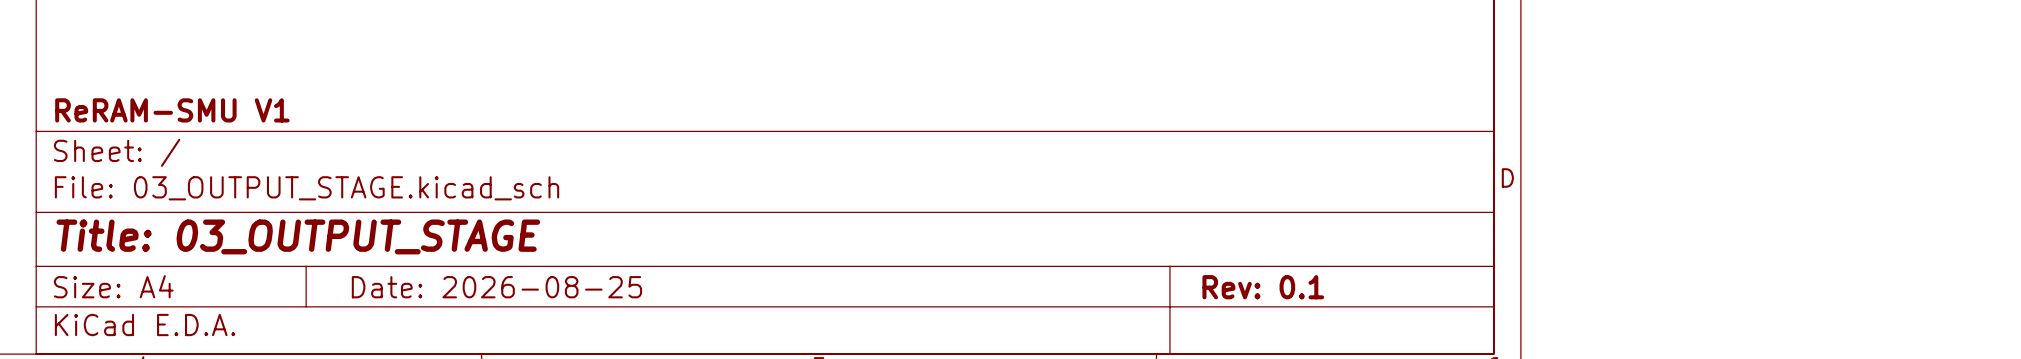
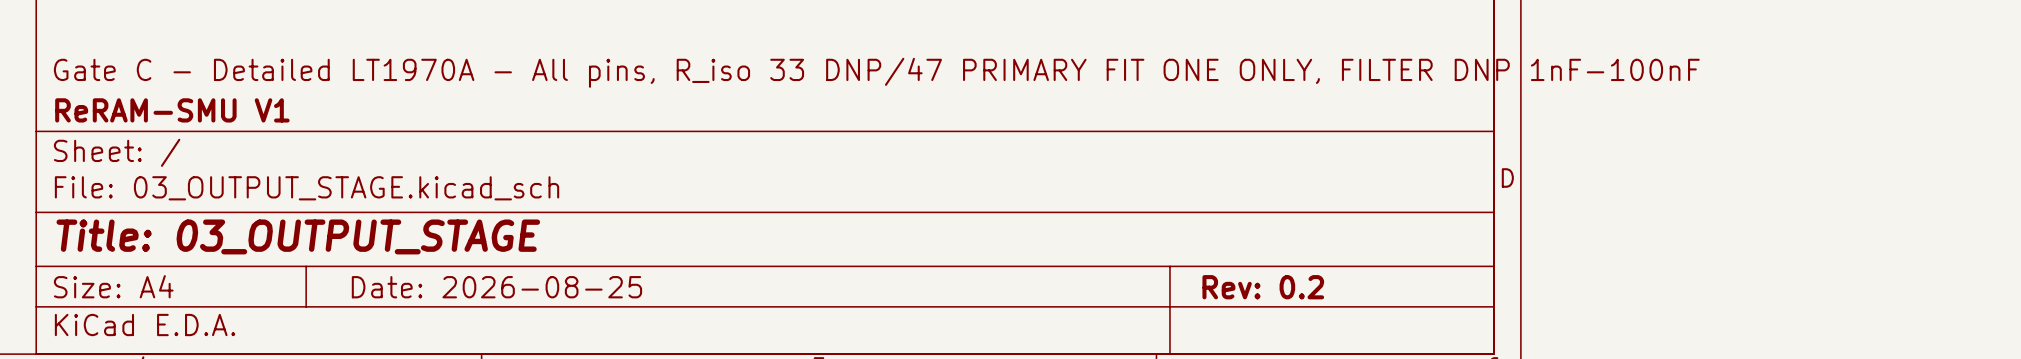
title block: none -> Gate C - Detailed LT1970A - All pins, R_iso 33 DNP/47 PRIMARY FIT ONE ONLY, FILTER DNP 1nF-100nF (876, 72)
title block: Rev: 0.1 (1263, 287) -> Rev: 0.2 (1263, 287)

